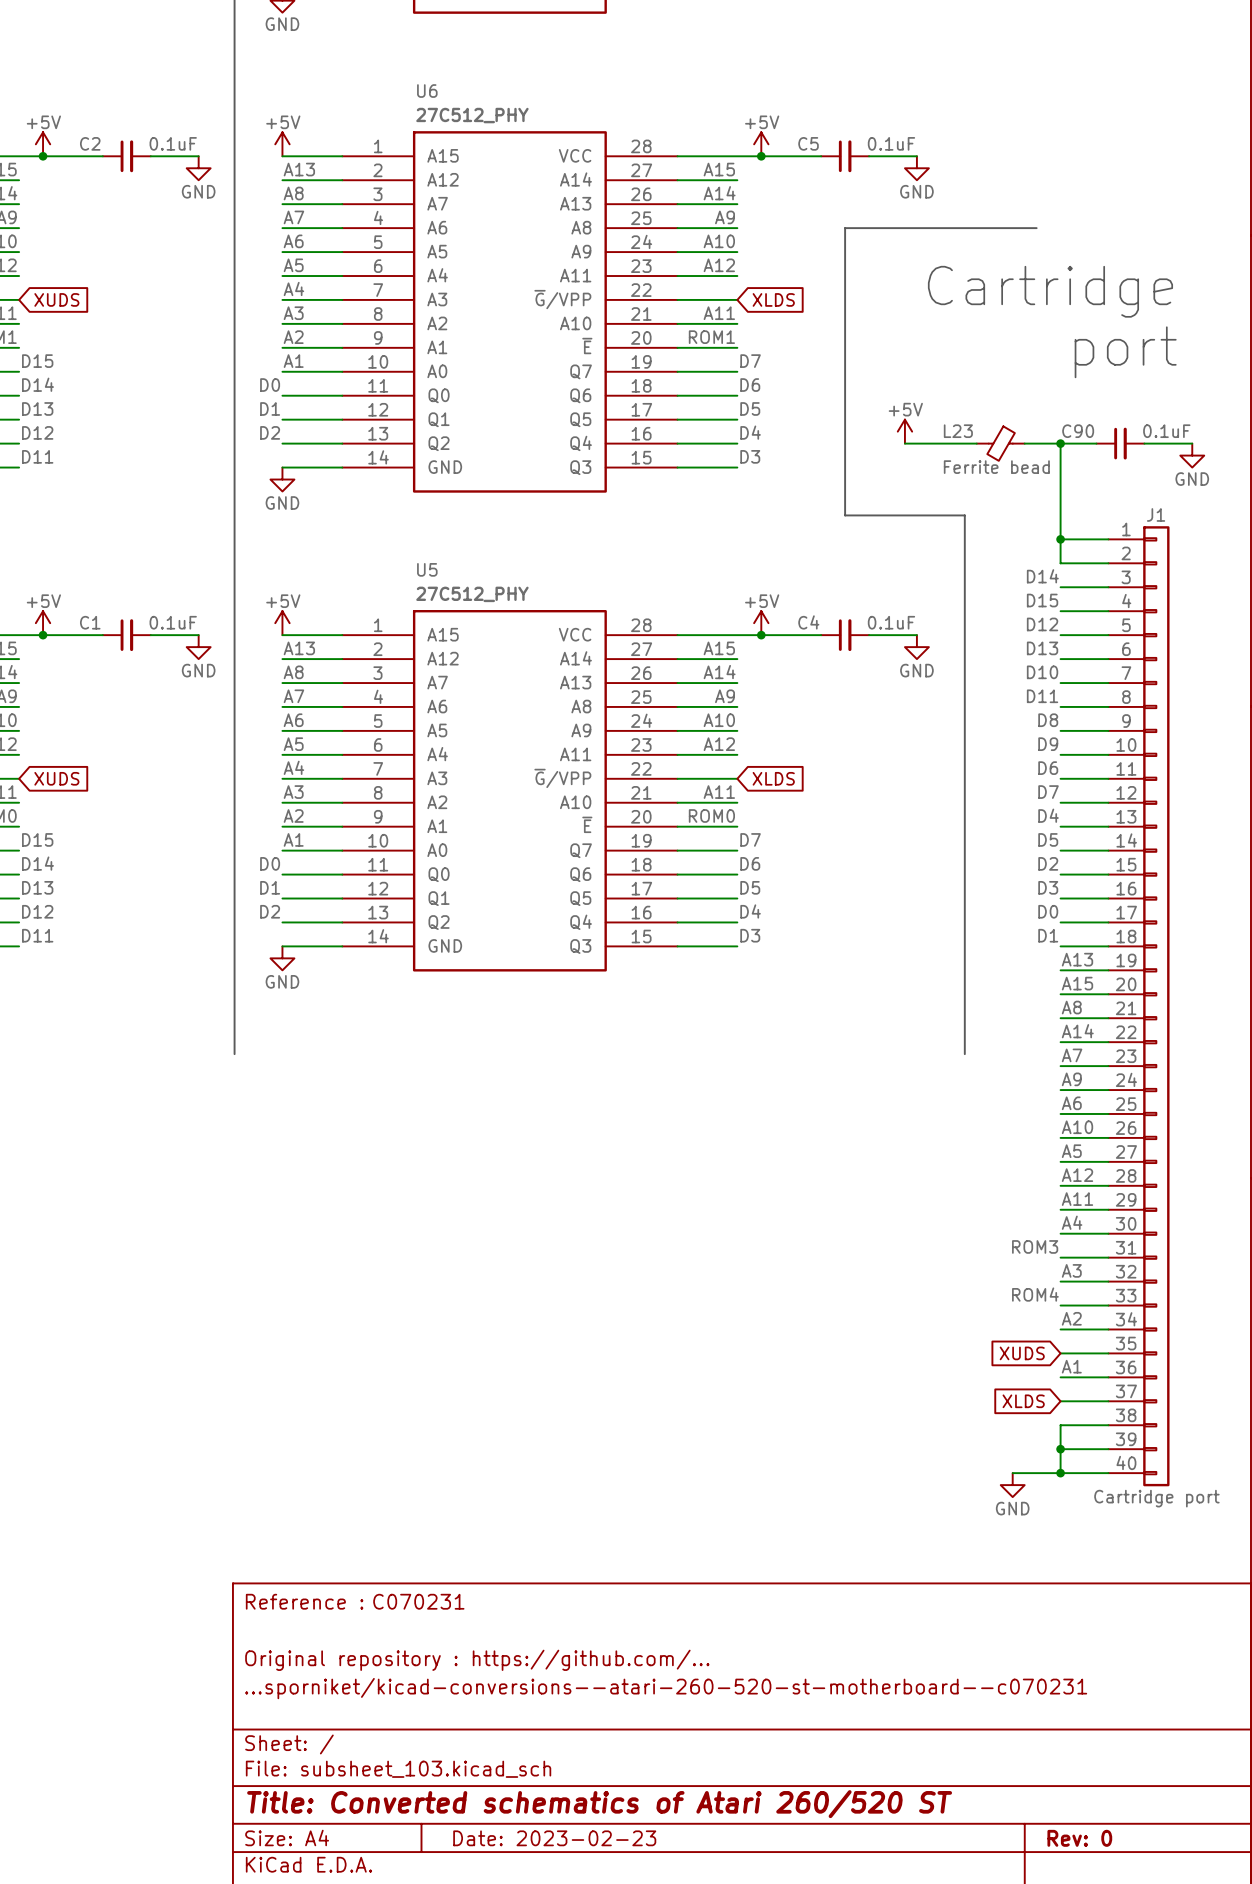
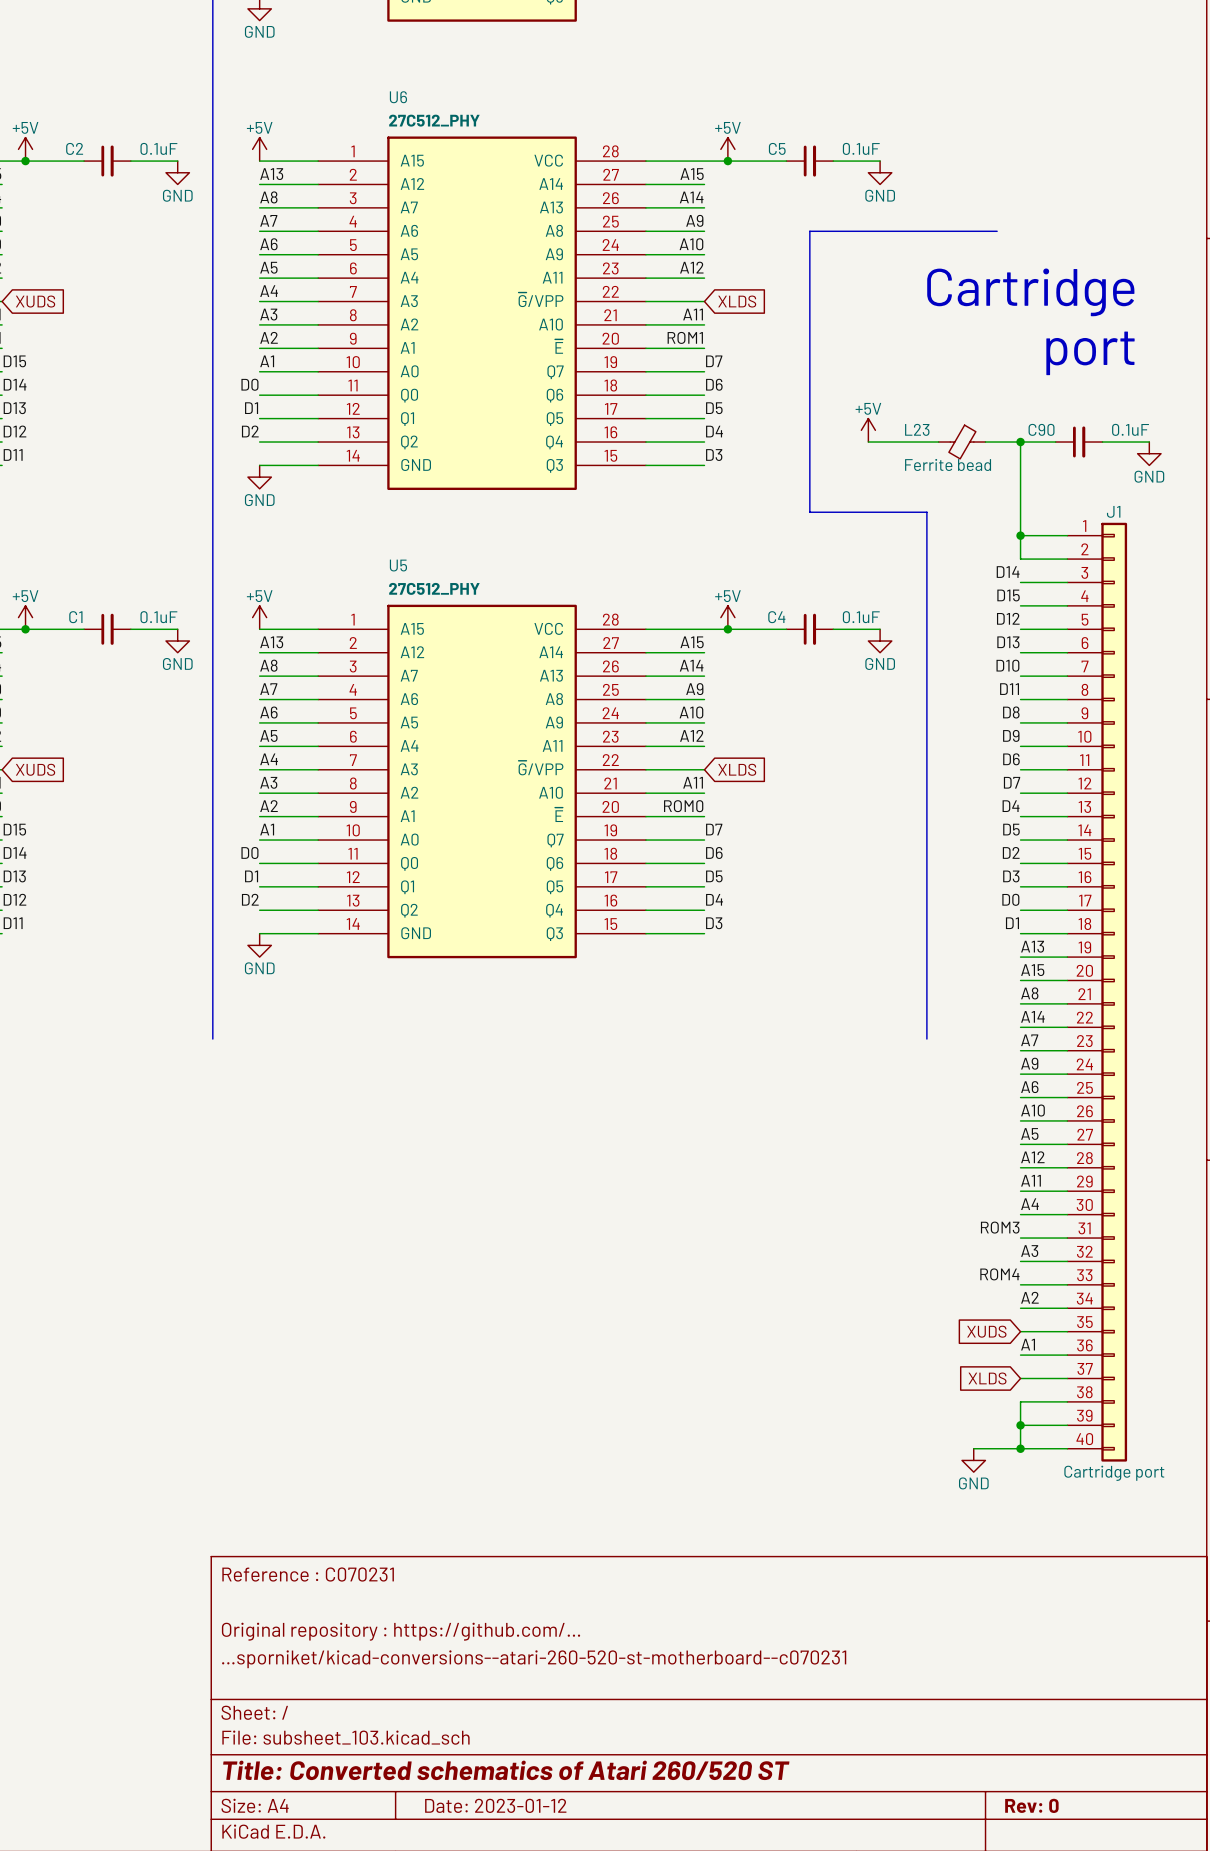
title block: Date: 2023-02-23 (554, 1838) -> Date: 2023-01-12 (495, 1805)

